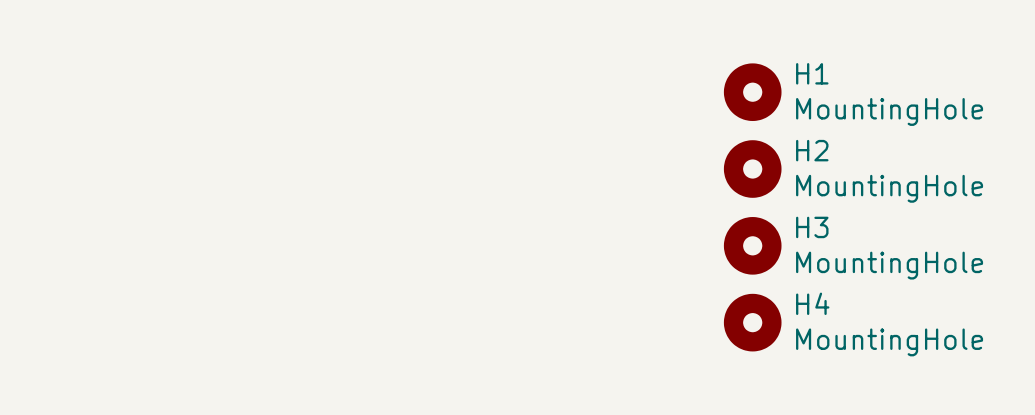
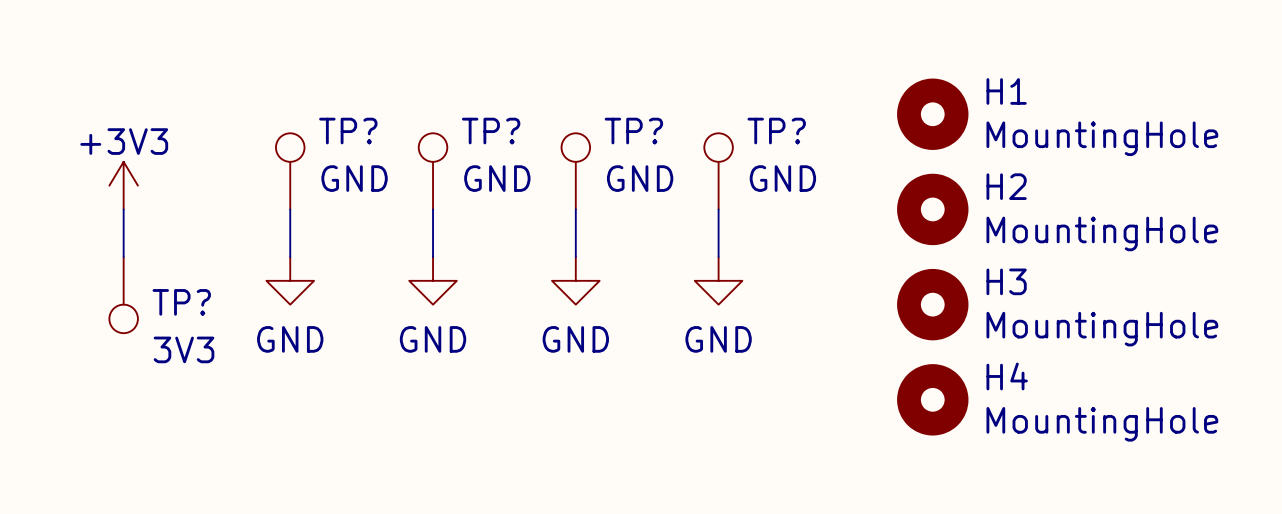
TP?: none -> GND (290, 171)
TP?: none -> GND (433, 171)
TP?: none -> GND (575, 171)
TP?: none -> GND (718, 171)
power symbol: none -> +3V3 (123, 185)
wire: none -> (123, 209) (123, 257)
wire: none -> (290, 209) (290, 257)
wire: none -> (433, 209) (433, 257)
wire: none -> (575, 209) (575, 257)
wire: none -> (718, 209) (718, 257)
power symbol: none -> GND (290, 280)
power symbol: none -> GND (433, 280)
power symbol: none -> GND (575, 280)
power symbol: none -> GND (718, 280)
TP?: none -> 3V3 (123, 295)

